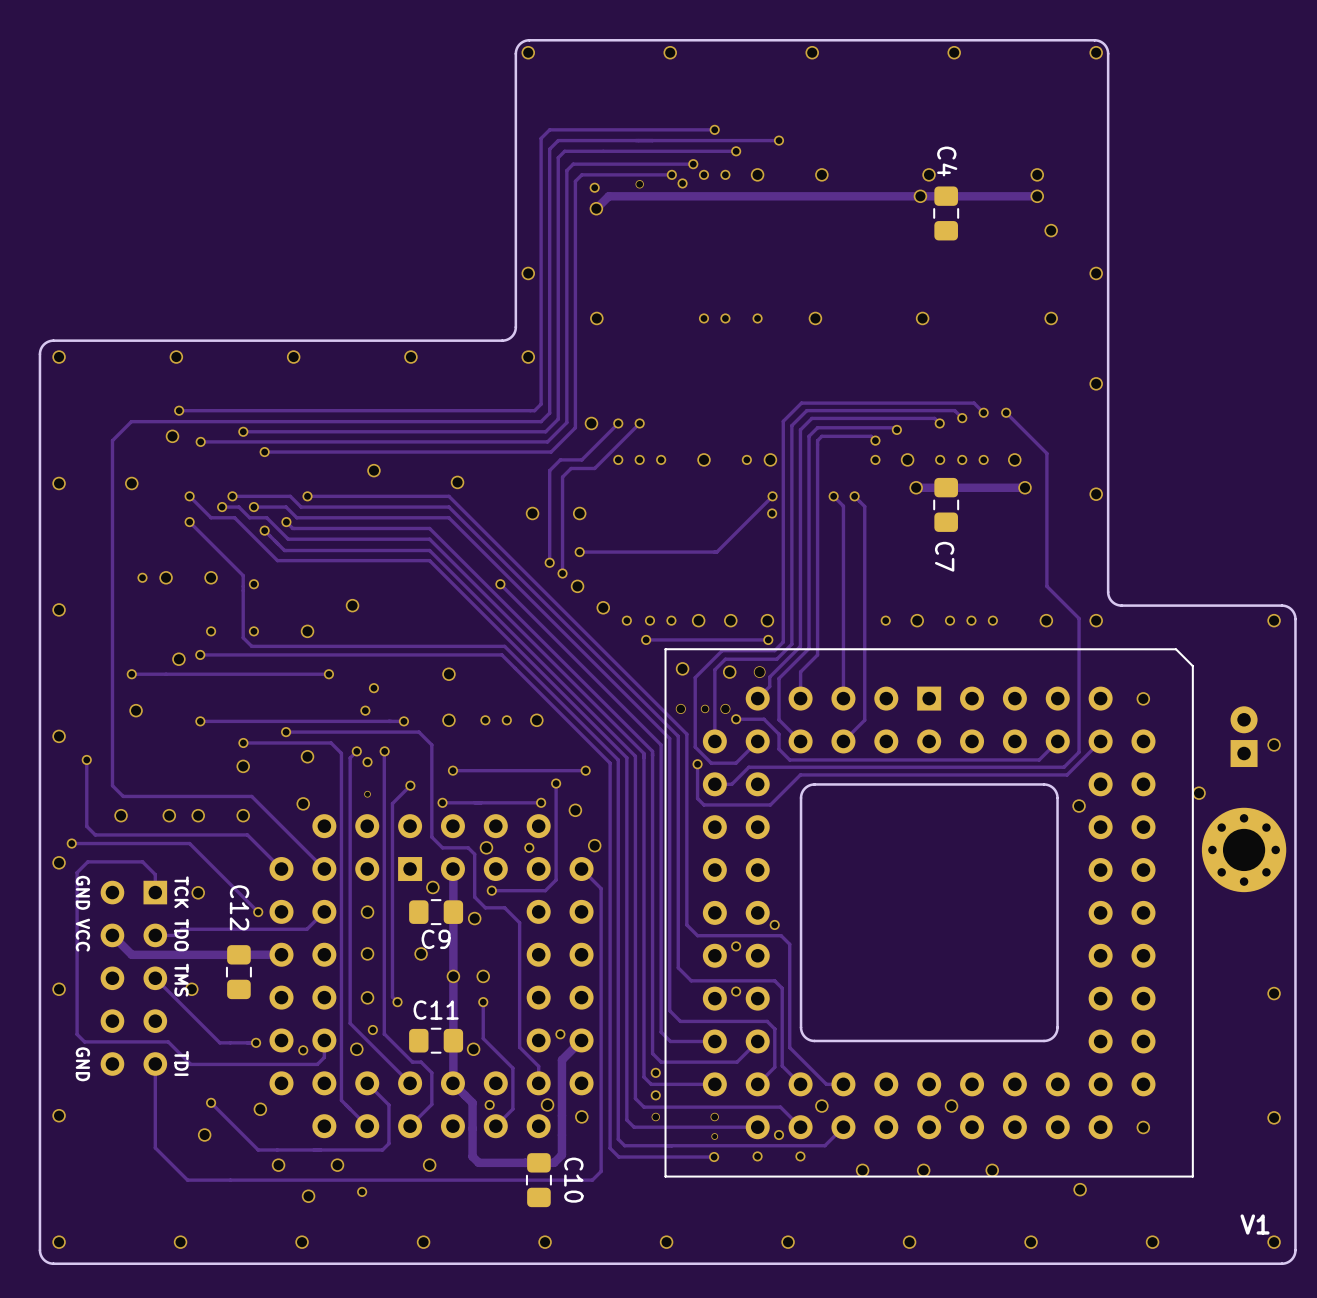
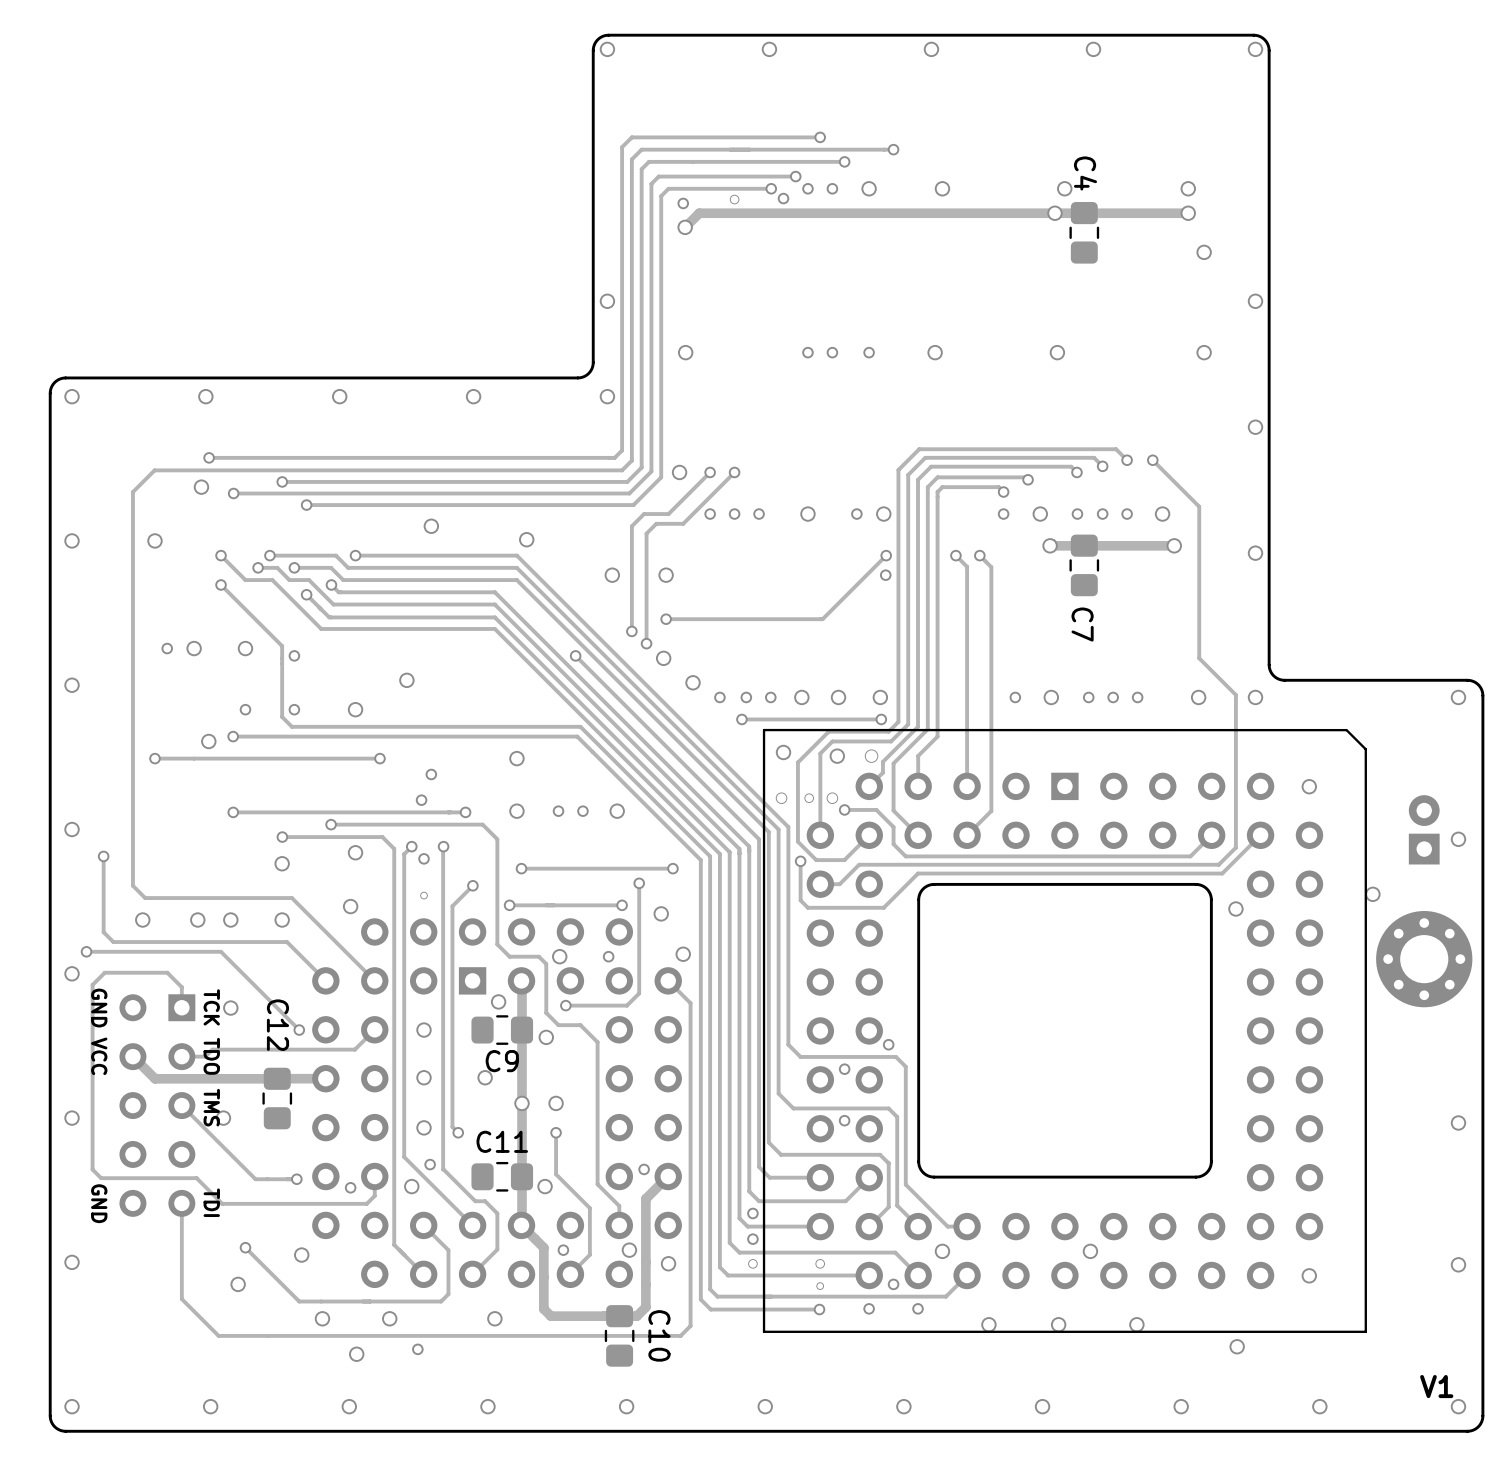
via: (136, 710) -> none

